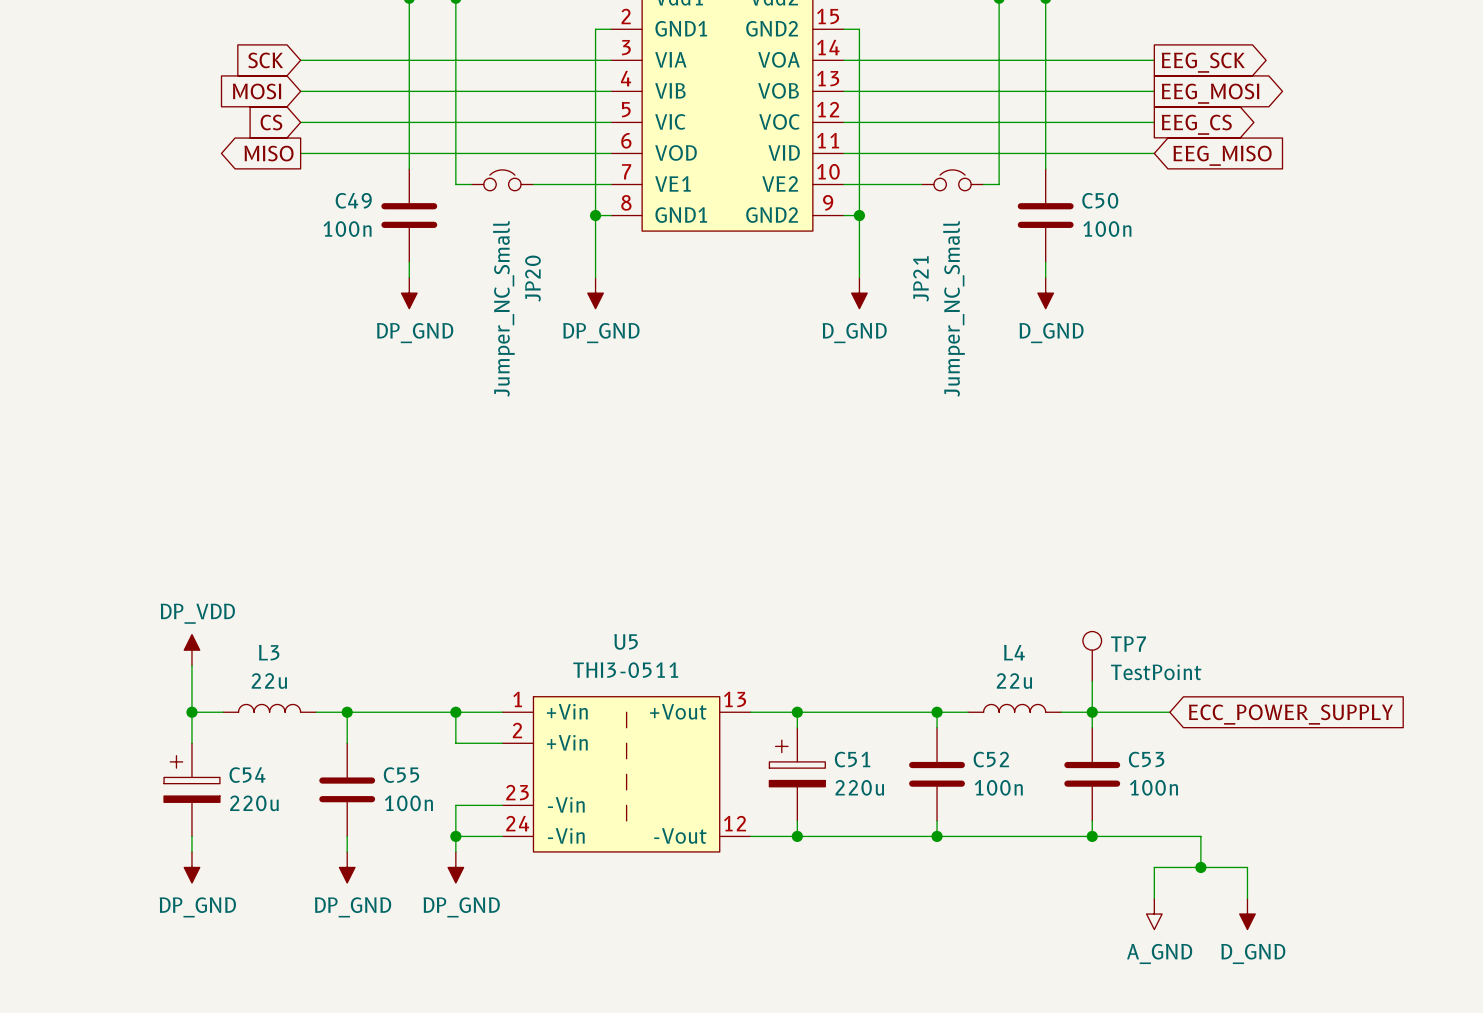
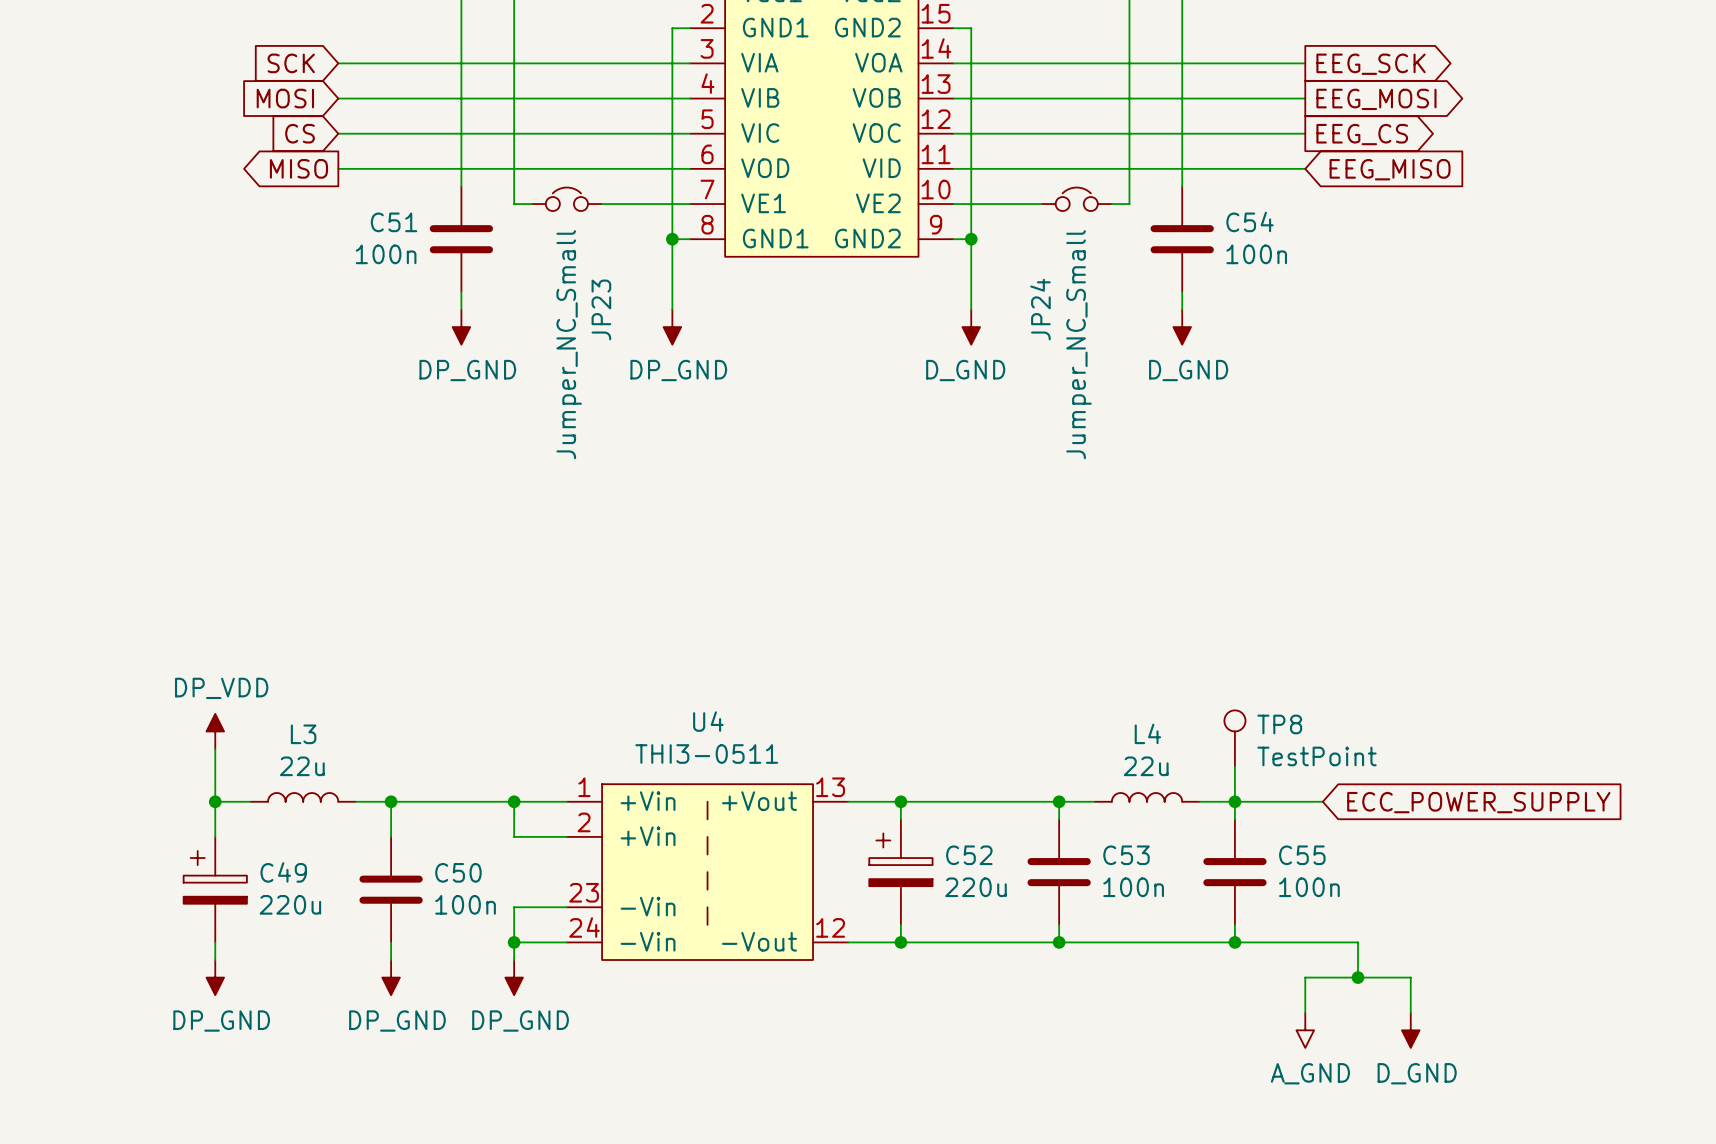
C49 name: C49 (353, 200) -> C51 (394, 222)
C50 name: C50 (1100, 200) -> C54 (1249, 221)
JP20 name: JP20 (532, 278) -> JP23 (601, 309)
JP21 name: JP21 (921, 278) -> JP24 (1040, 309)
U5 name: U5 (626, 641) -> U4 (708, 721)
TP7 name: TP7 (1128, 644) -> TP8 (1279, 724)
C51 name: C51 (852, 759) -> C52 (969, 855)
C52 name: C52 (991, 759) -> C53 (1126, 855)
C53 name: C53 (1146, 759) -> C55 (1302, 855)
C54 name: C54 (247, 775) -> C49 (283, 872)
C55 name: C55 (401, 775) -> C50 (458, 872)

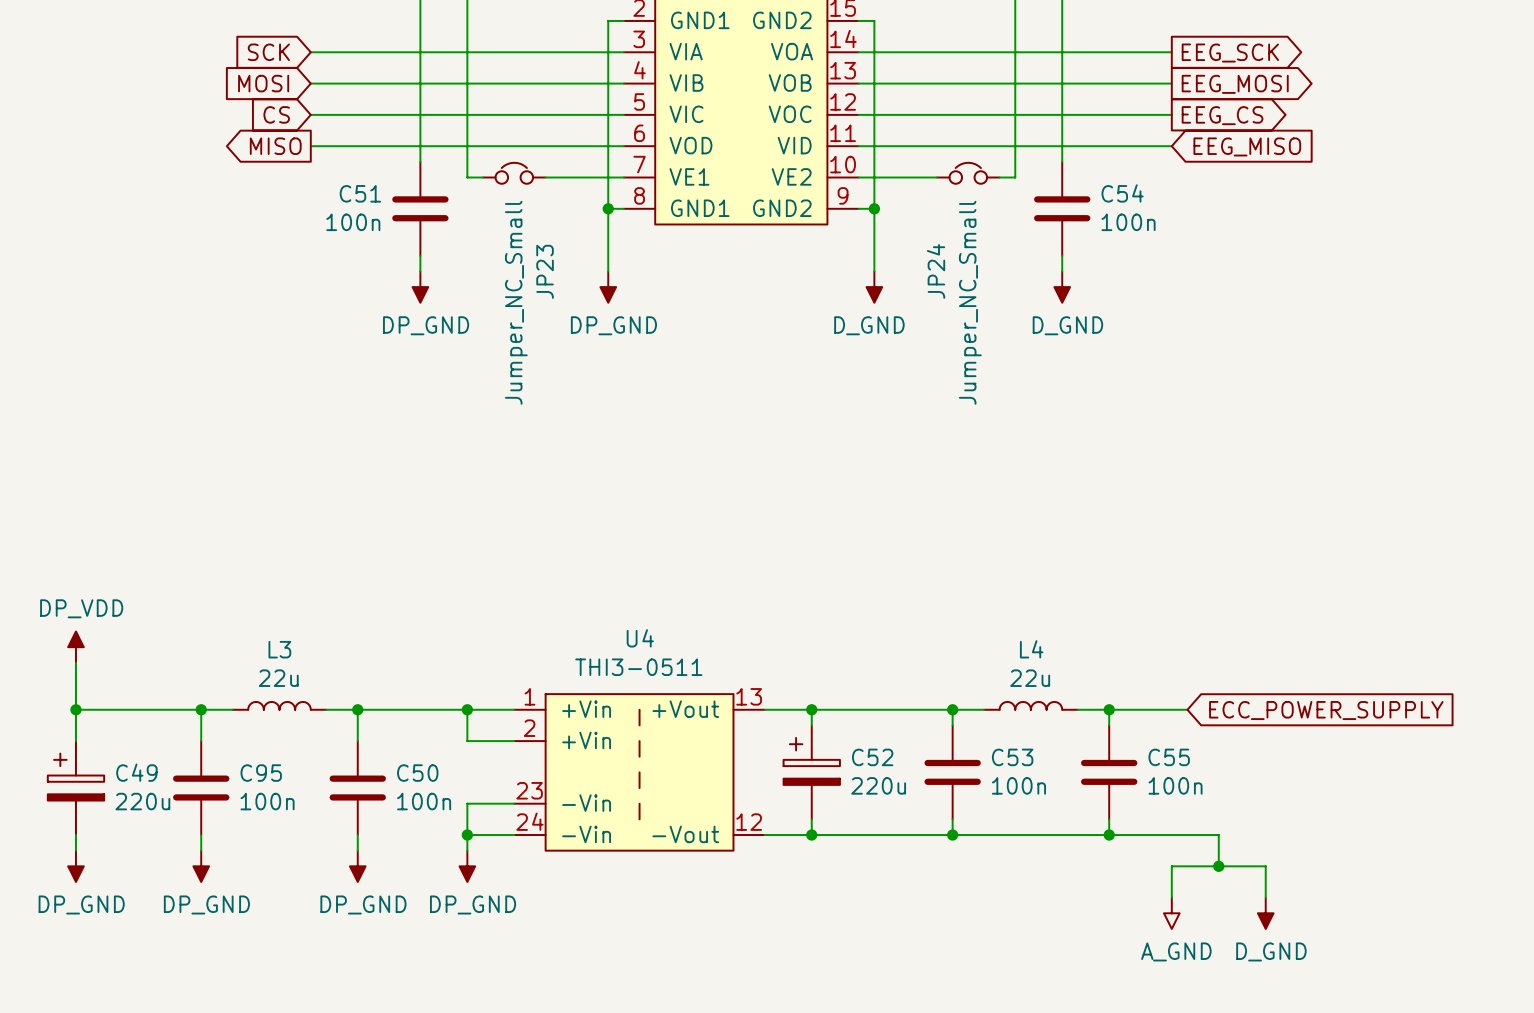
power symbol position: DP_VDD (215, 731) -> DP_VDD (75, 647)
TP8: TestPoint (1234, 738) -> none
wire: none -> (75, 662) (75, 741)
wire: (215, 749) (215, 801) -> (75, 709) (201, 709)
wire: (1234, 766) (1234, 801) -> none
junction: none -> (75, 709)
C49 position: (215, 889) -> (75, 788)
C95: none -> 100n (201, 788)
wire: none -> (75, 835) (75, 850)
power symbol: none -> DP_GND (75, 866)

